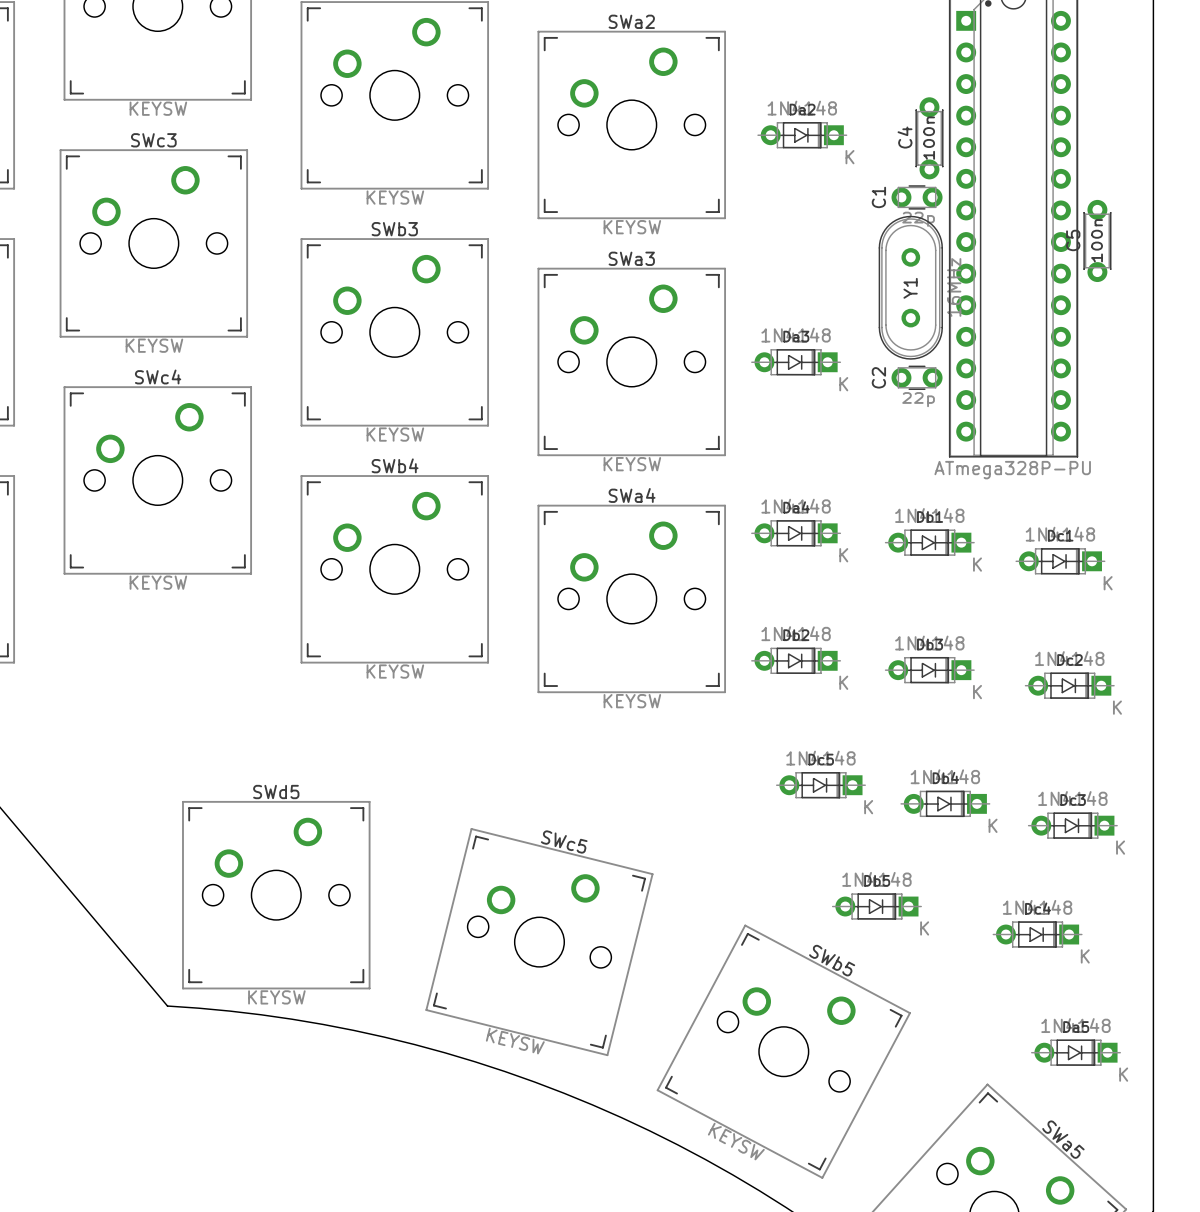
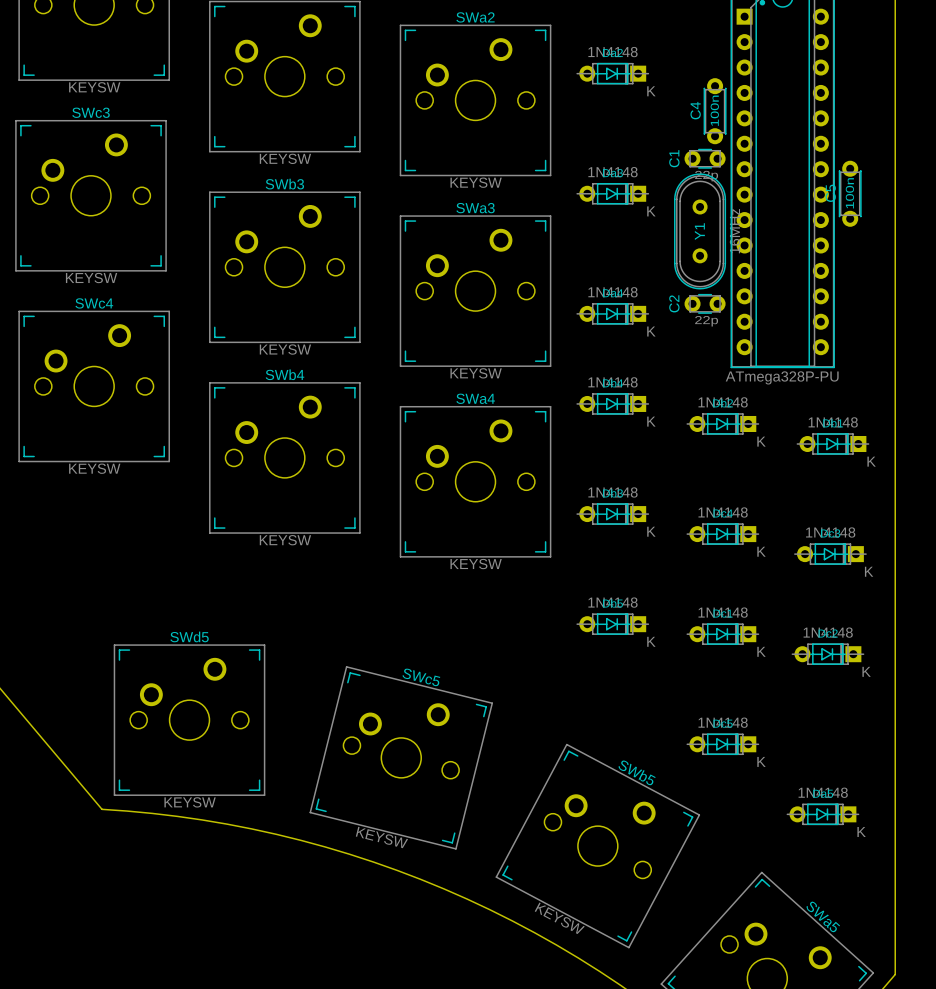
Da2 position: (802, 135) -> (612, 73)
Da3 position: (796, 362) -> (612, 193)
Da4 position: (796, 533) -> (612, 313)
Db1 position: (929, 542) -> (832, 444)
Dc1 position: (1060, 561) -> (722, 634)
Db2 position: (796, 660) -> (722, 423)
Db3 position: (929, 670) -> (612, 514)
Dc2 position: (1069, 685) -> (827, 654)
Dc5 position: (820, 785) -> (722, 744)
Db4 position: (945, 803) -> (612, 403)
Dc3 position: (1072, 825) -> (830, 554)
Db5 position: (876, 906) -> (612, 624)
Dc4 position: (1037, 934) -> (722, 534)
Da5 position: (1075, 1052) -> (822, 814)

